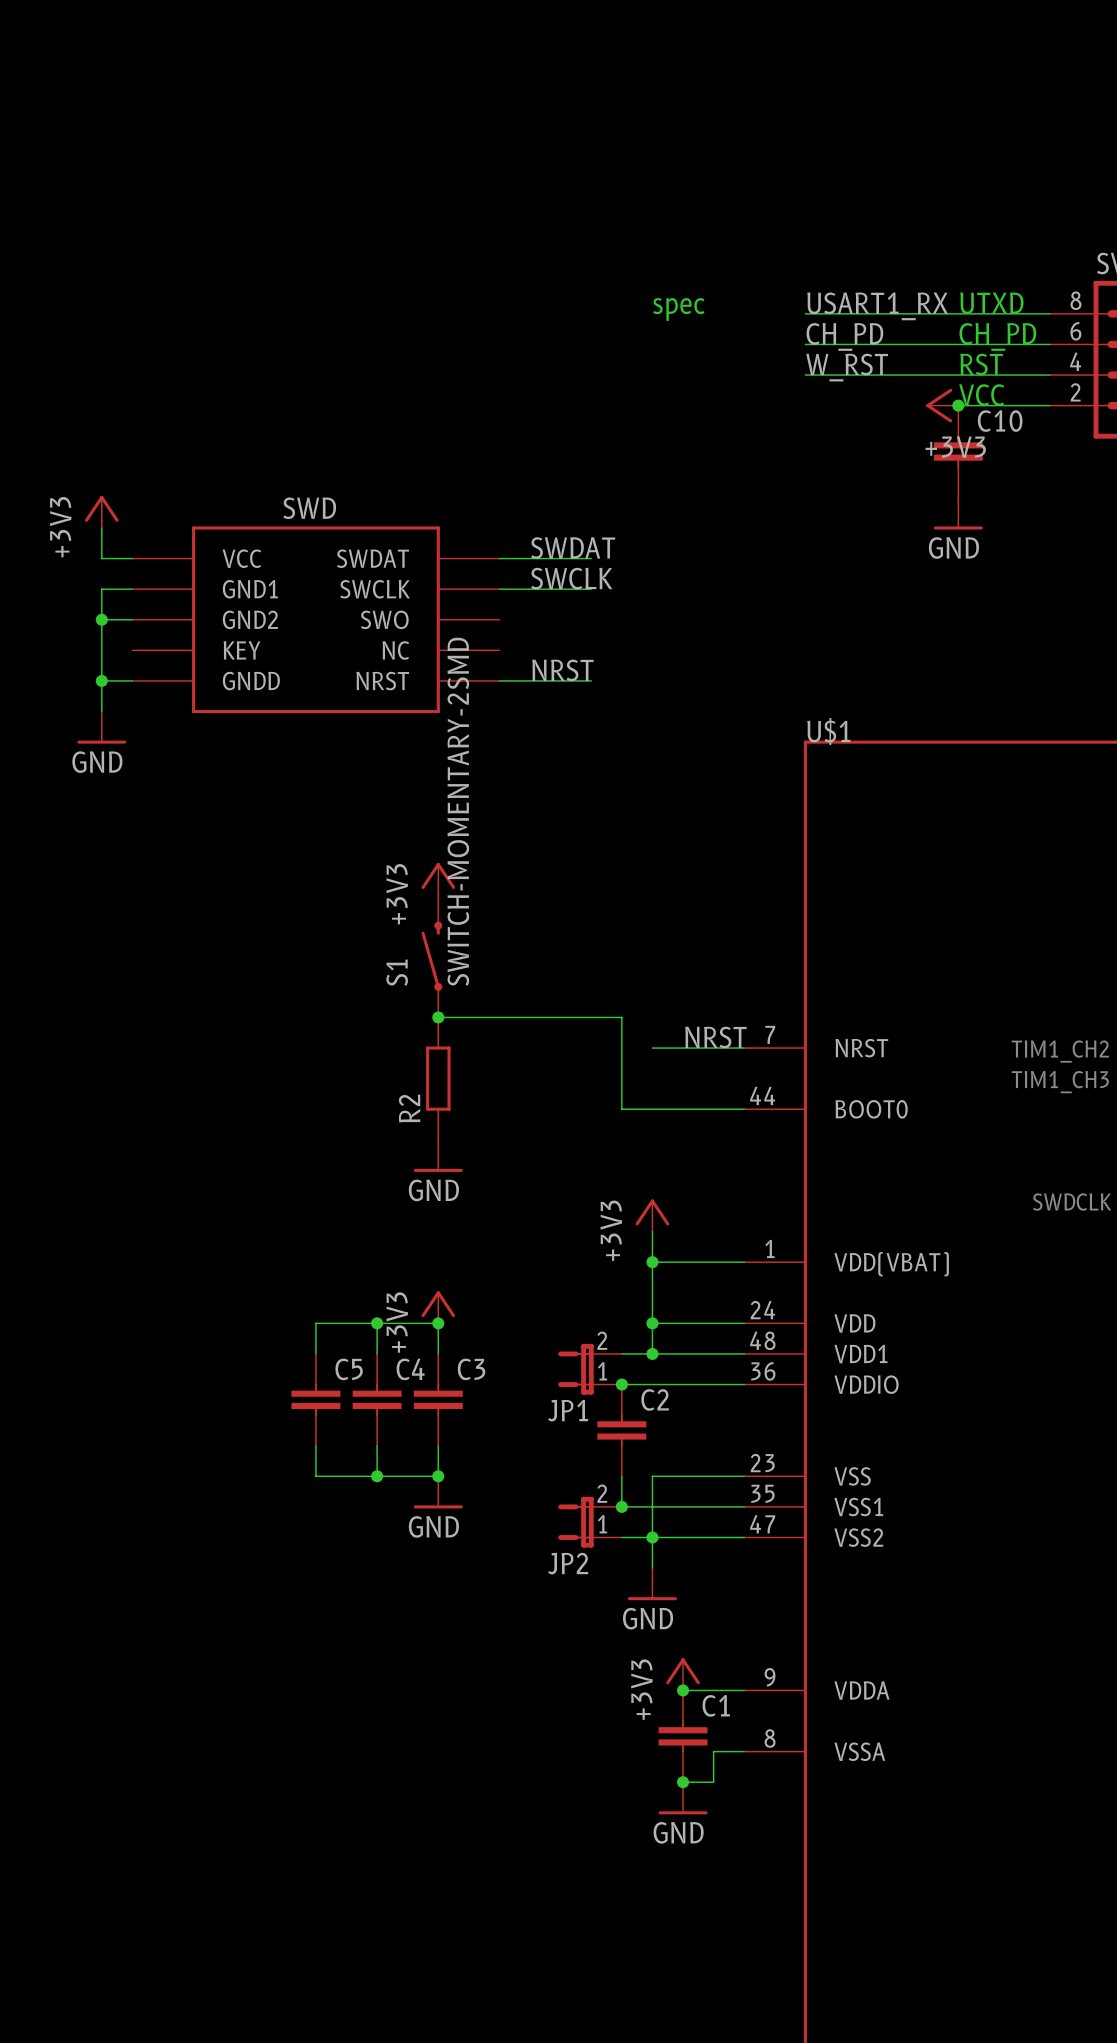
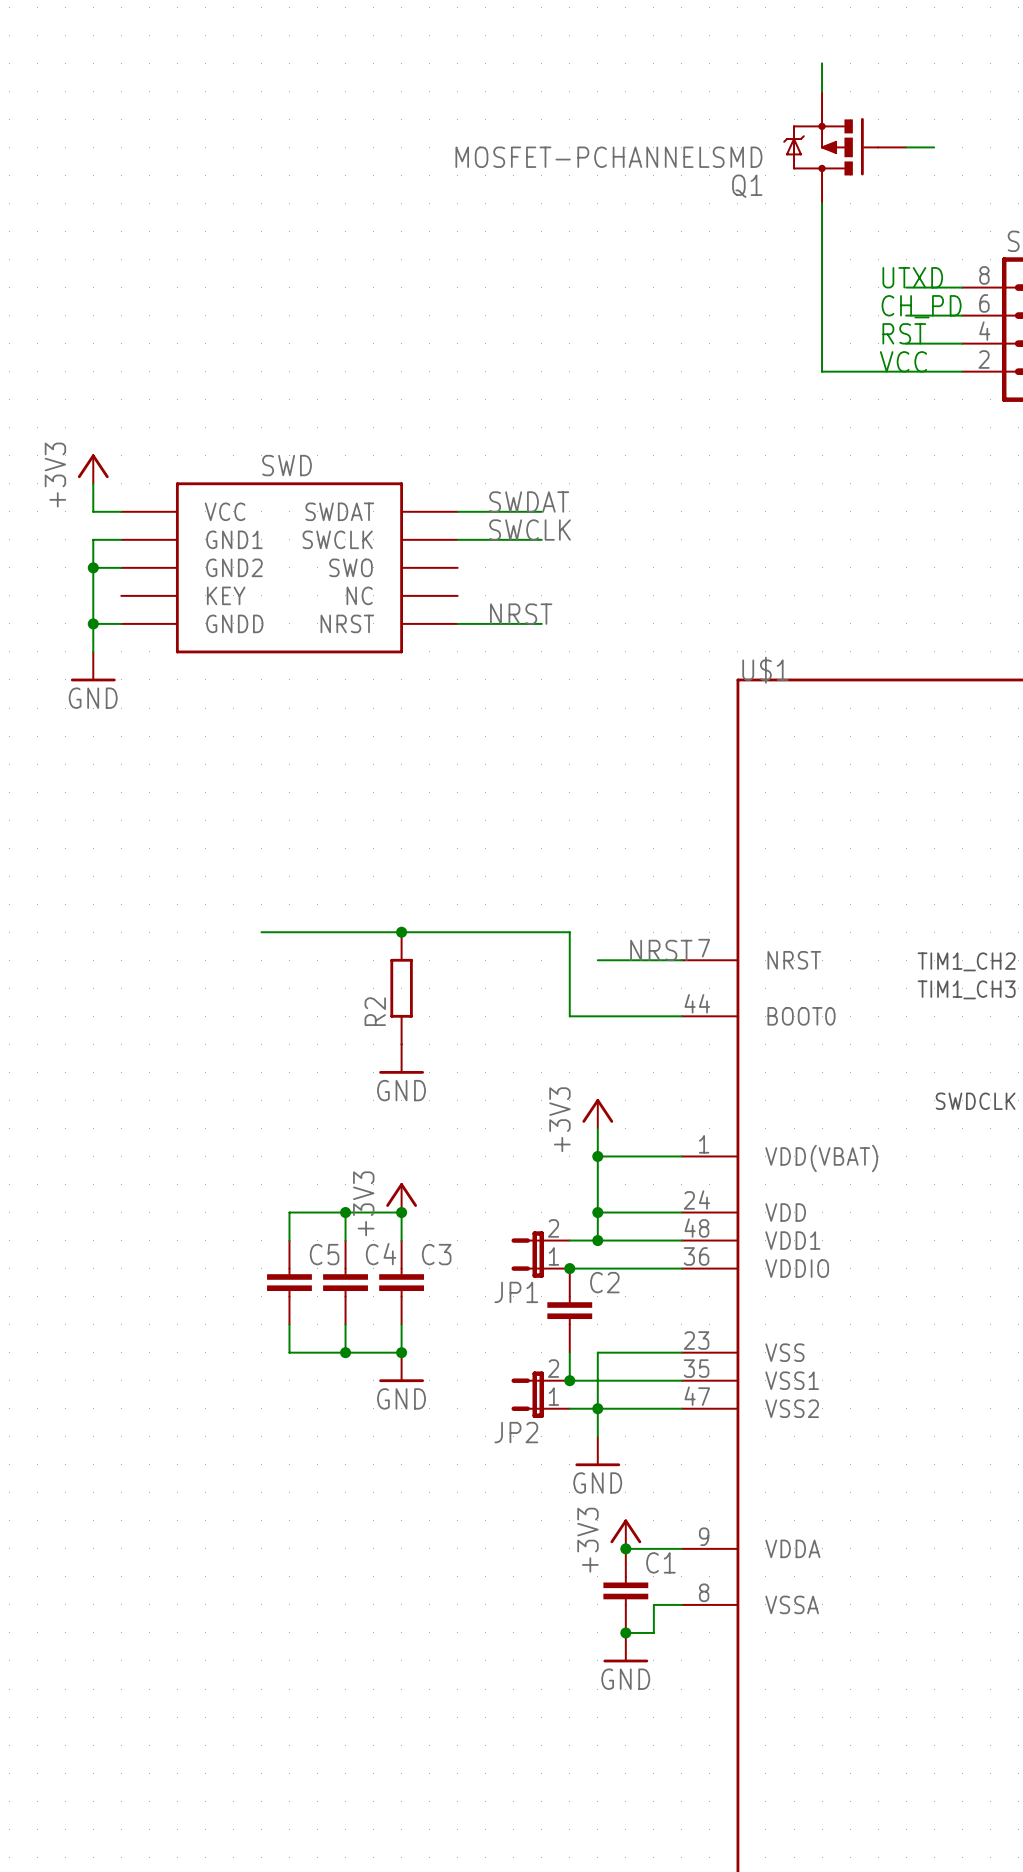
wire: none -> (822, 63) (822, 91)
Q1: none -> MOSFET-PCHANNELSMD (844, 147)
wire: none -> (906, 147) (934, 147)
wire: none -> (822, 203) (822, 371) (878, 371)
label: USART1_RX (877, 306) -> none
text: spec (678, 309) -> none
wire: (805, 313) (988, 313) -> none
label: CH_PD (844, 336) -> none
wire: (805, 344) (988, 344) -> none
label: W_RST (847, 367) -> none
wire: (805, 375) (988, 375) -> none
power symbol: +3V3 (942, 405) -> none
junction: (958, 405) -> none
C10: (958, 451) -> none
power symbol: GND (958, 513) -> none
power symbol: +3V3 (438, 879) -> none
S1: SWITCH-MOMENTARY-2SMD (431, 956) -> none
wire: none -> (261, 932) (401, 932)

